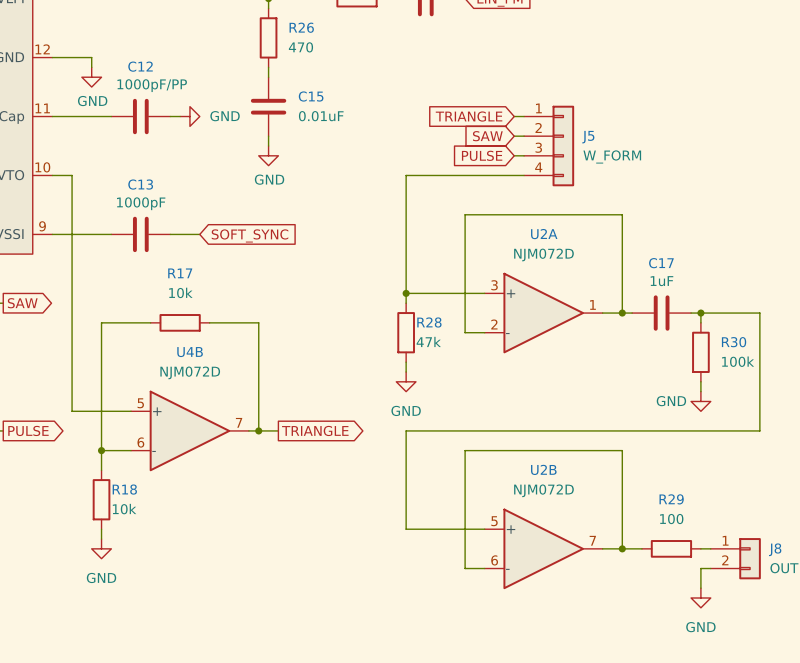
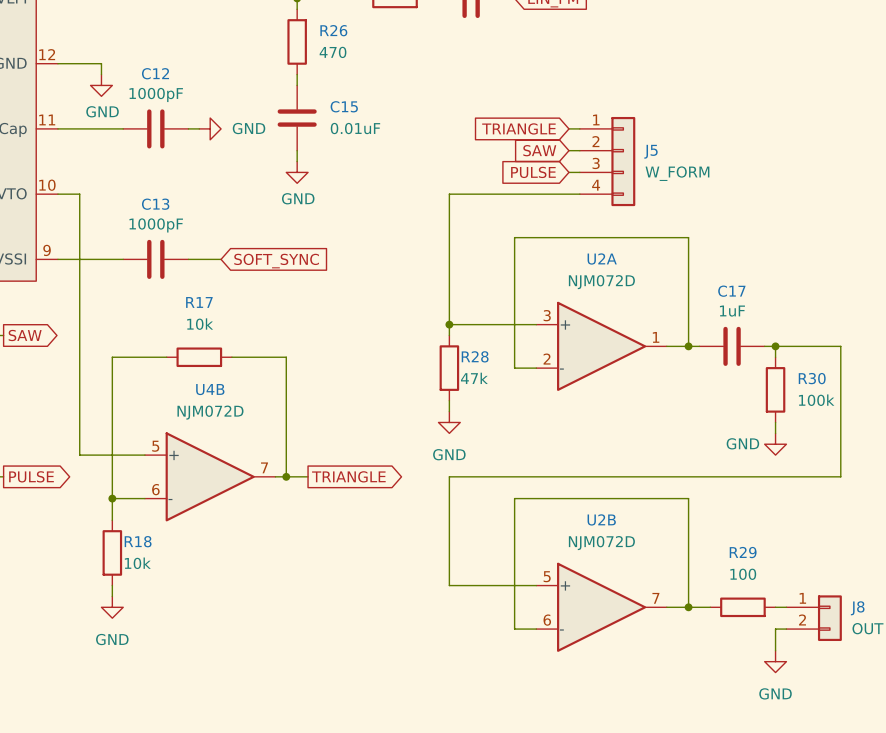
C12 value: 1000pF/PP (152, 85) -> 1000pF (156, 94)

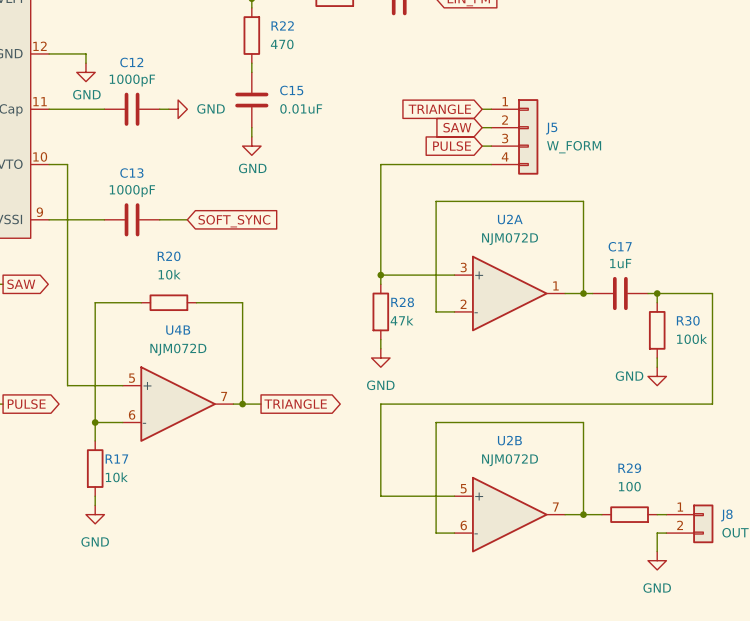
R26 name: R26 (333, 30) -> R22 (282, 25)
R17 name: R17 (199, 302) -> R20 (169, 256)
R18 name: R18 (138, 541) -> R17 (116, 459)

